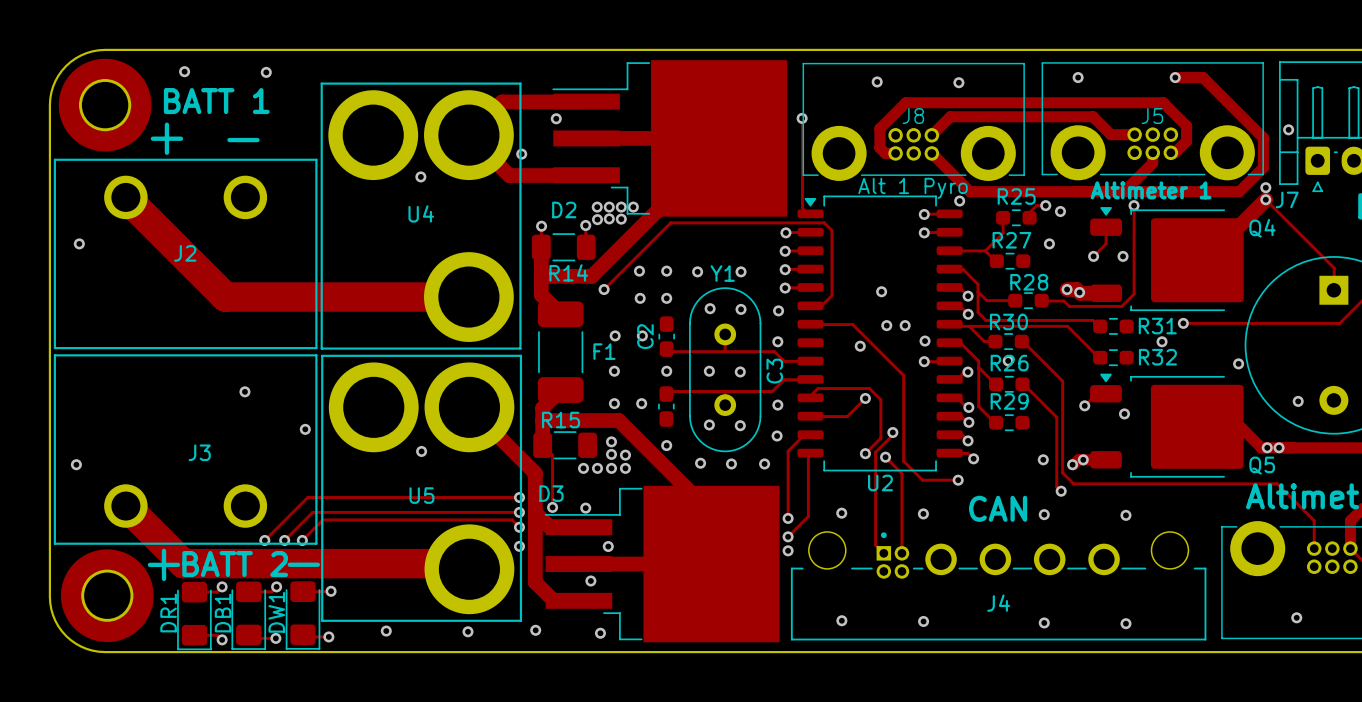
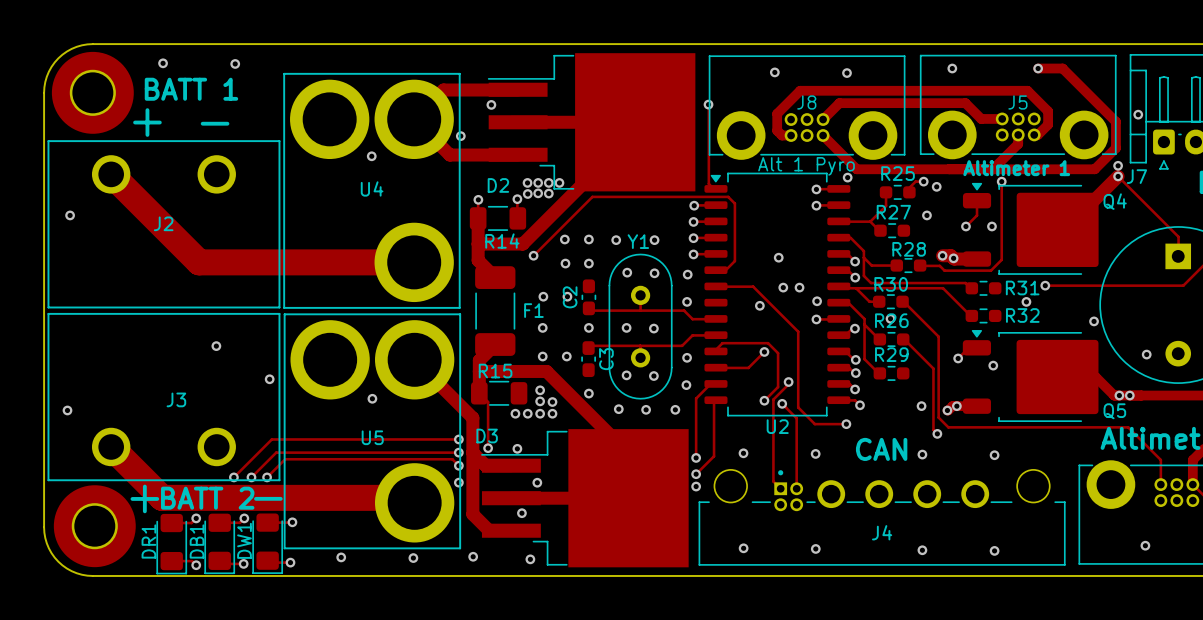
C3 name position: C3 (774, 371) -> C3 (606, 359)

